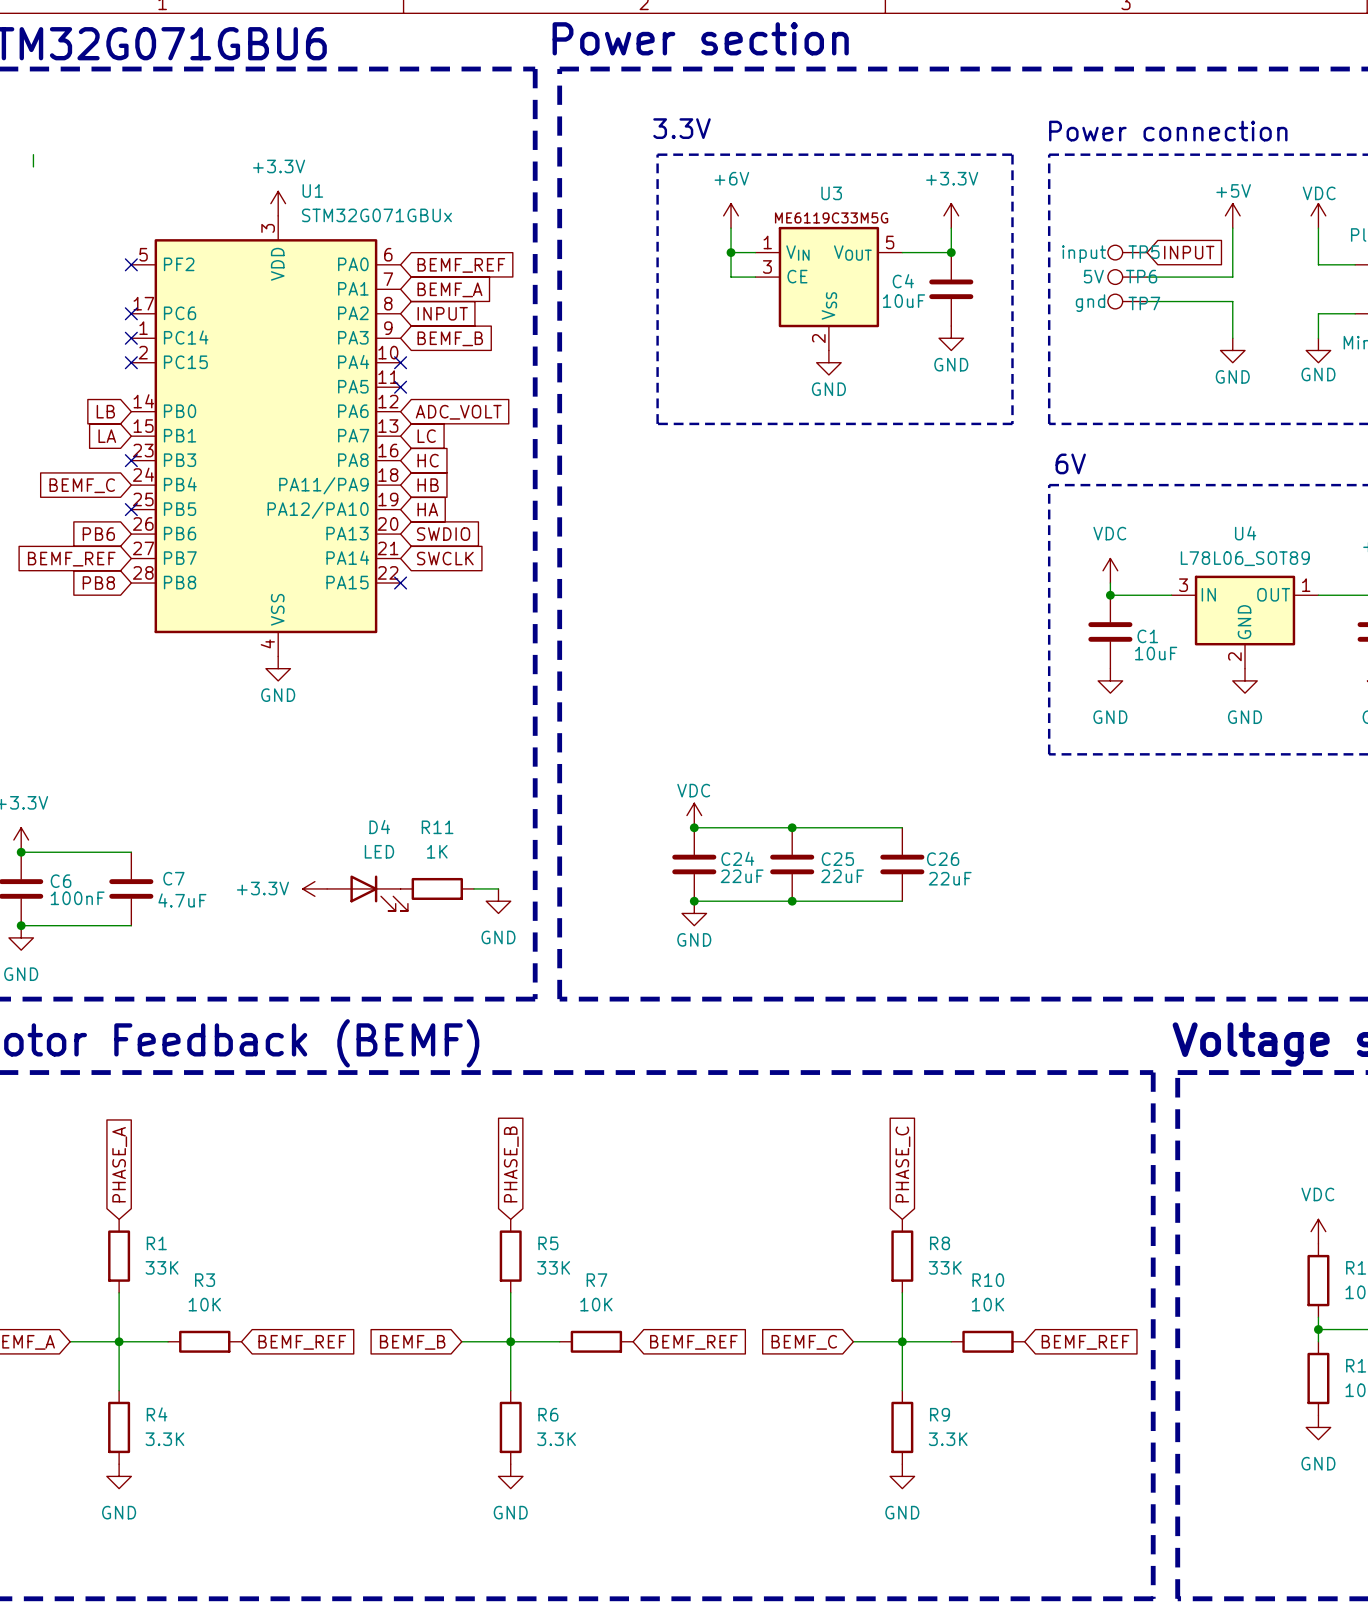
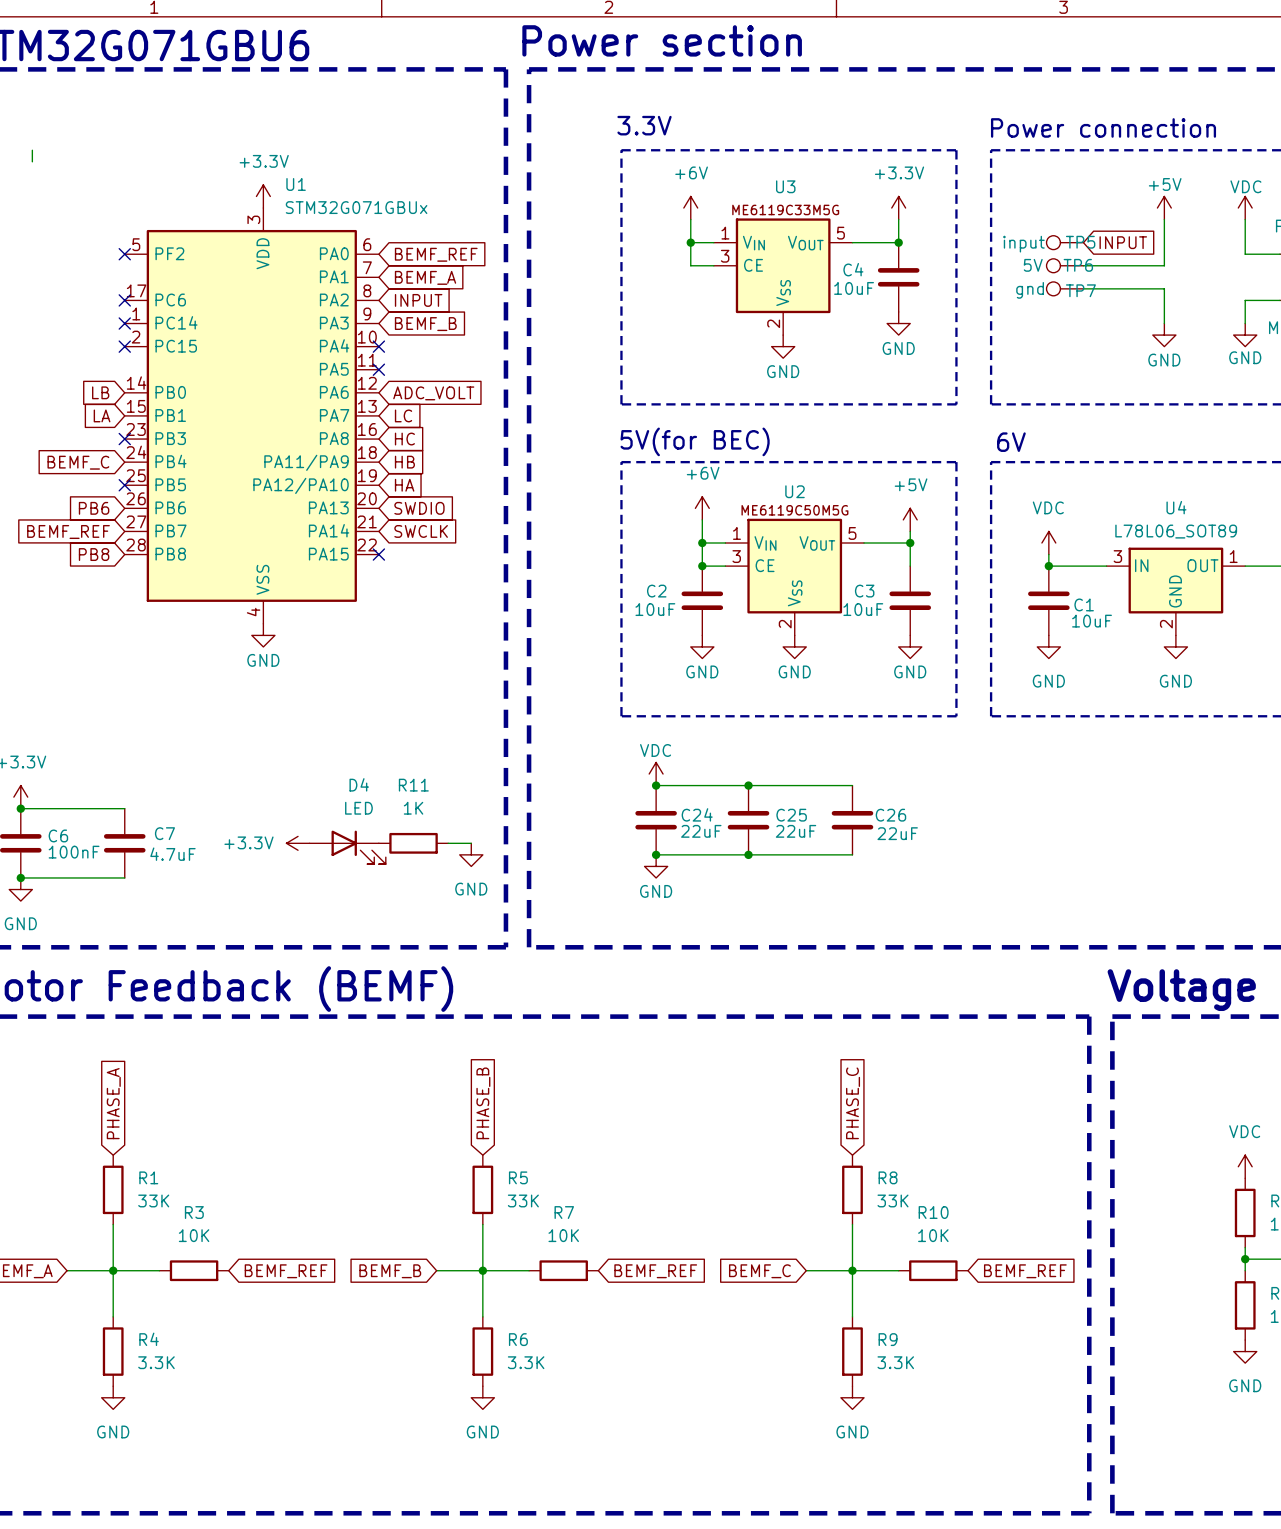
text: none -> 5V(for BEC) (695, 441)
line: none -> (621, 462) (956, 462) (956, 716) (621, 716) (621, 462)
power symbol: none -> +6V (702, 508)
wire: none -> (702, 519) (702, 566) (725, 566)
power symbol: none -> +5V (910, 519)
wire: none -> (910, 531) (910, 566)
wire: none -> (702, 542) (725, 542)
junction: none -> (702, 542)
wire: none -> (864, 542) (910, 542)
junction: none -> (910, 542)
junction: none -> (702, 566)
U2: none -> (794, 577)
C2: none -> 10uF (702, 600)
C3: none -> 10uF (910, 600)
power symbol: none -> GND (702, 646)
power symbol: none -> GND (794, 646)
power symbol: none -> GND (910, 646)

